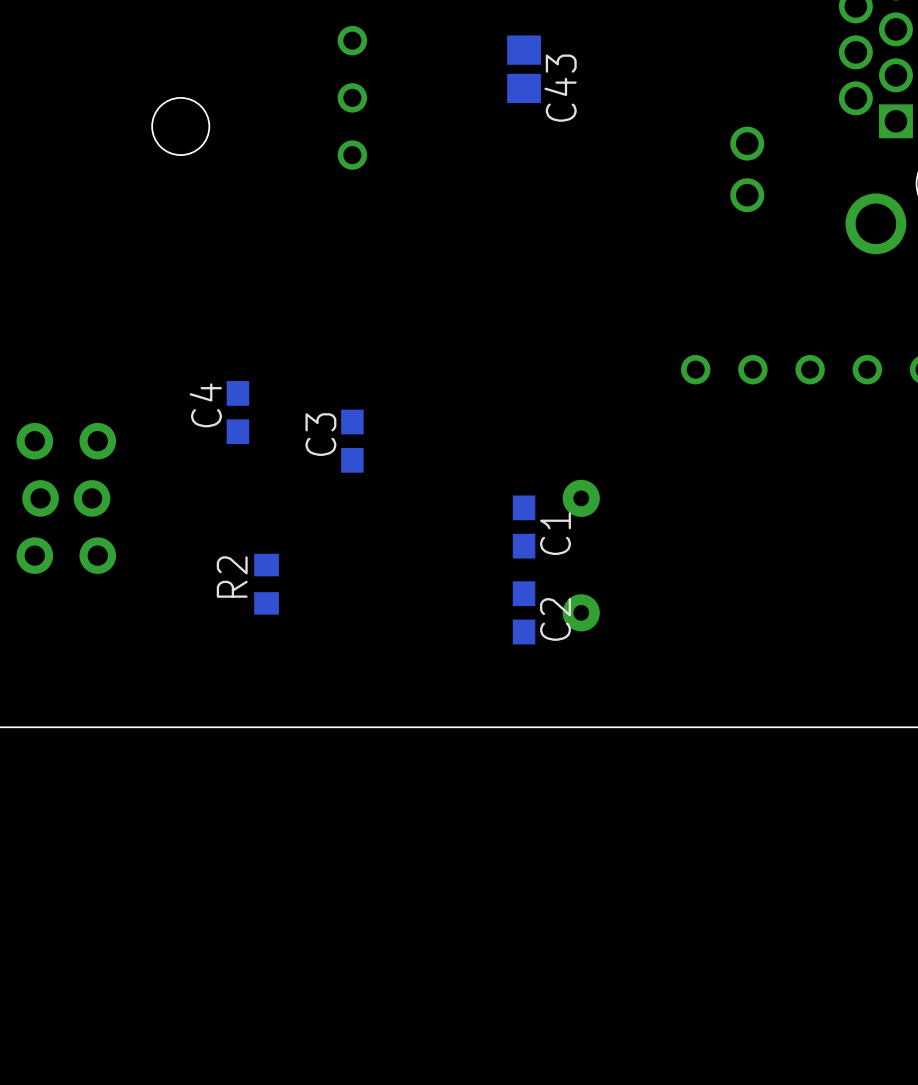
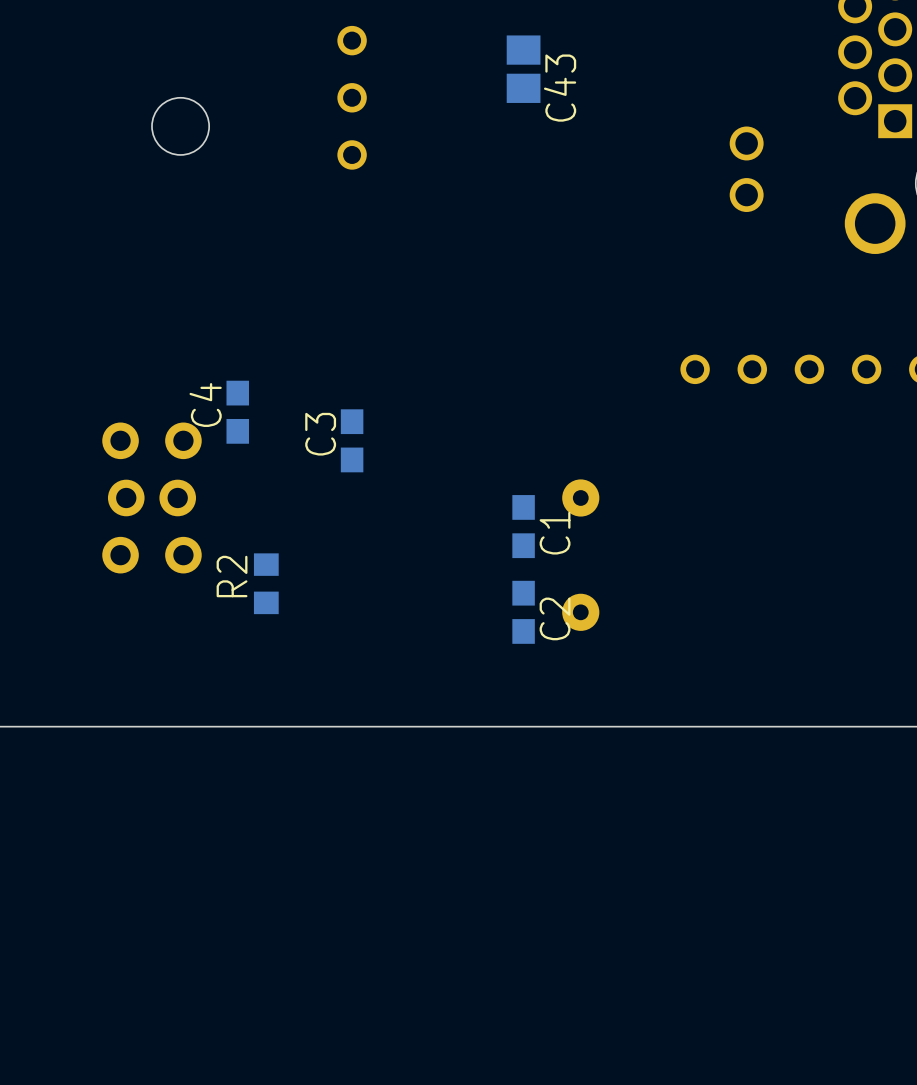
part position: (66, 498) -> (151, 497)

